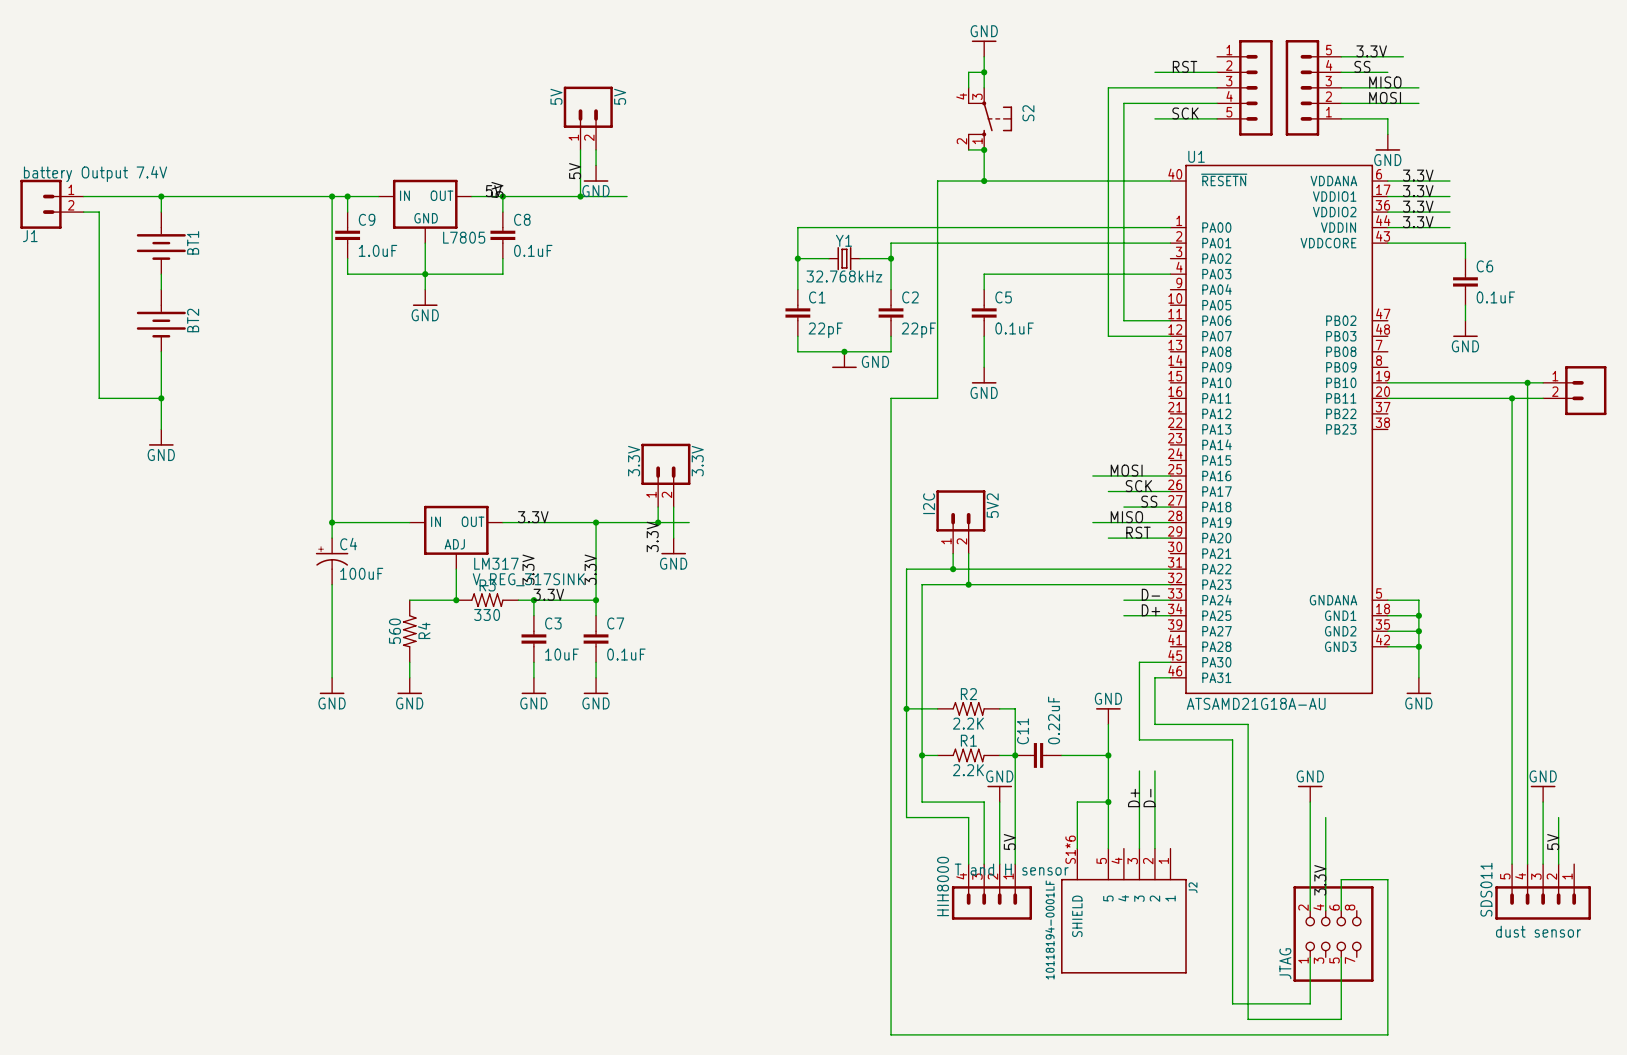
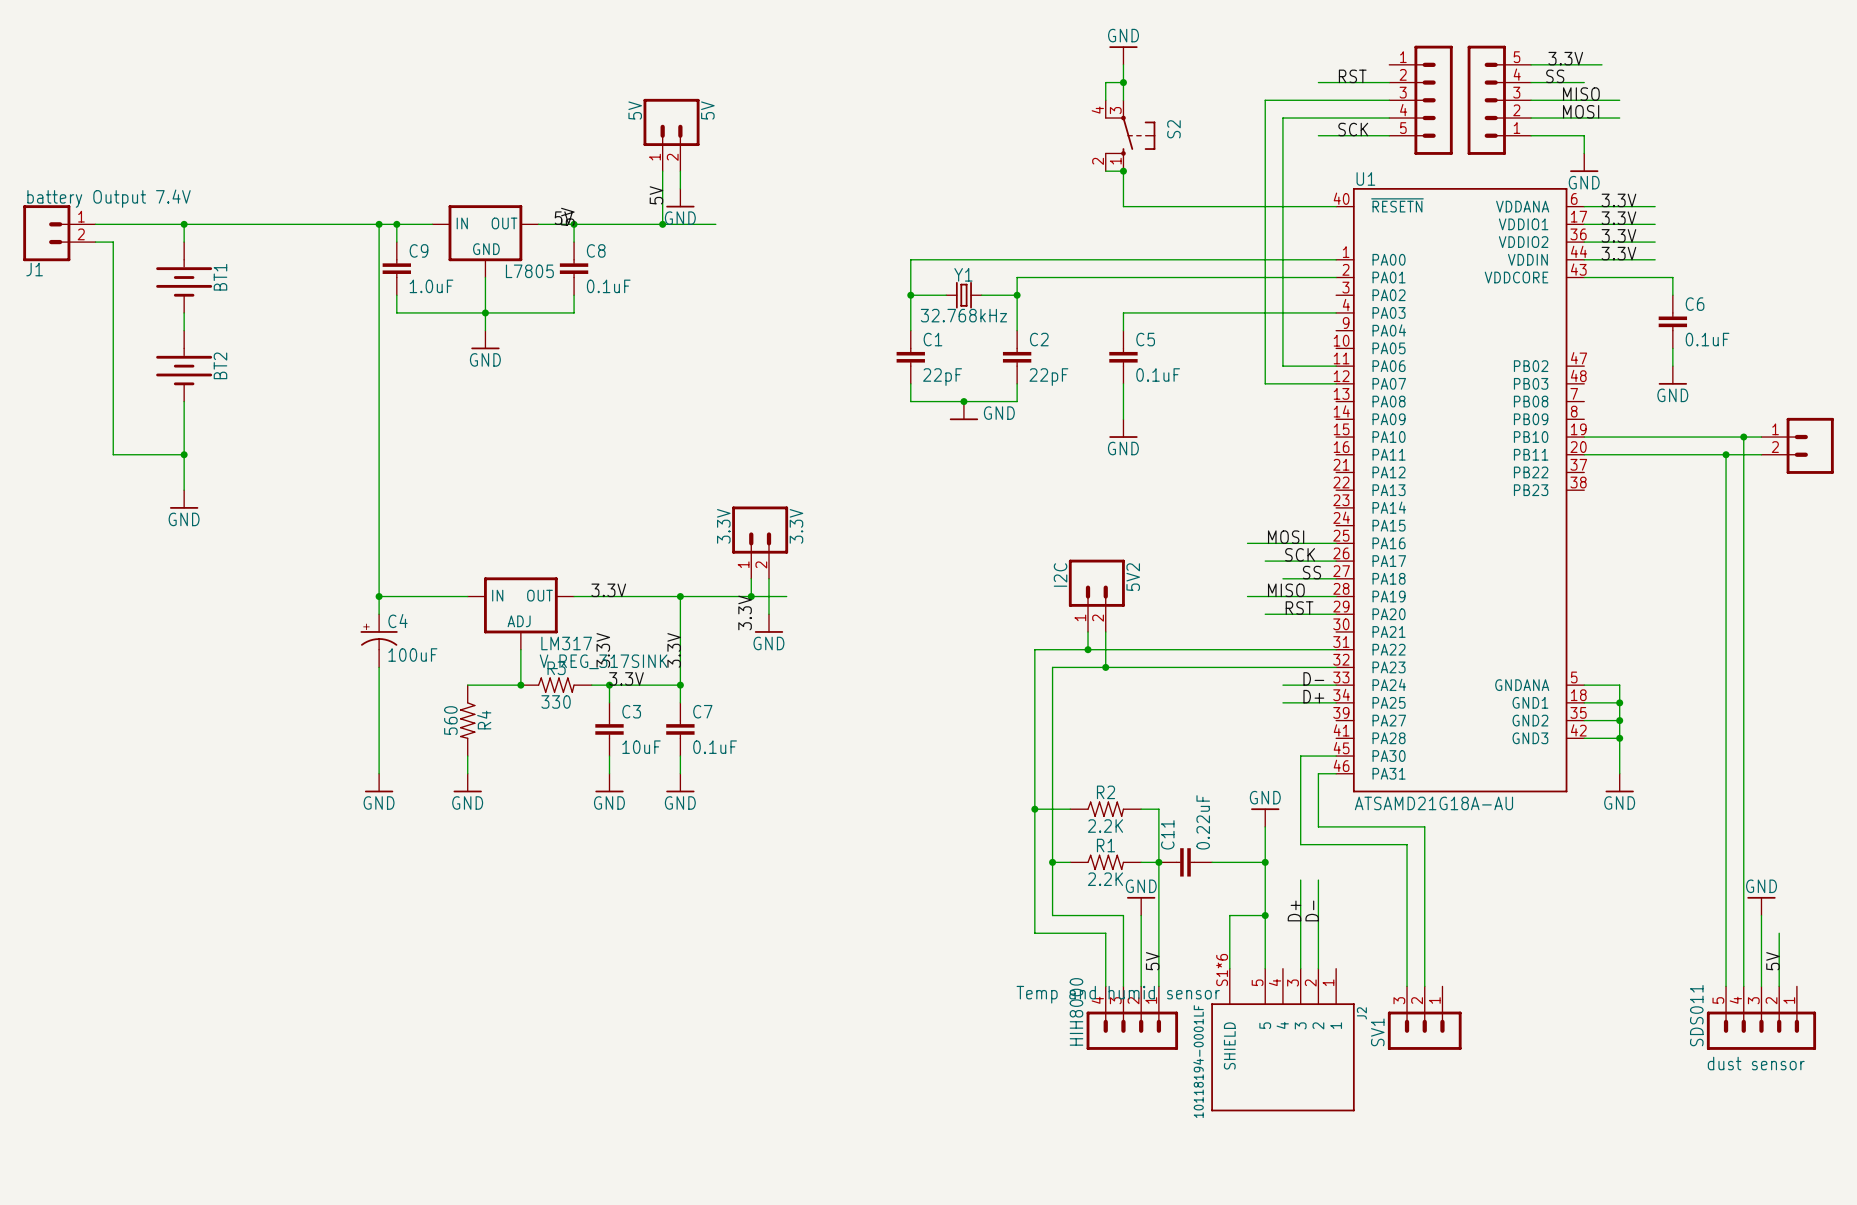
wire: (984, 181) (937, 181) (937, 398) (891, 398) (891, 1034) (1387, 1034) (1387, 879) (1341, 879) (1341, 910) -> none
junction: (984, 181) -> none
power symbol: GND (1310, 793) -> none
wire: (1310, 802) (1310, 910) -> none
wire: (1325, 817) (1325, 910) -> none
wire: (1232, 864) (1232, 1003) (1310, 1003) (1310, 957) -> none
wire: (1248, 864) (1248, 1019) (1341, 1019) (1341, 957) -> none
HIH8000 value: T and H sensor (1011, 869) -> Temp and humid sensor (1118, 994)
label: 3.3V (1320, 880) -> none
SV1: none -> (1424, 1018)
JTAG: (1333, 934) -> none

